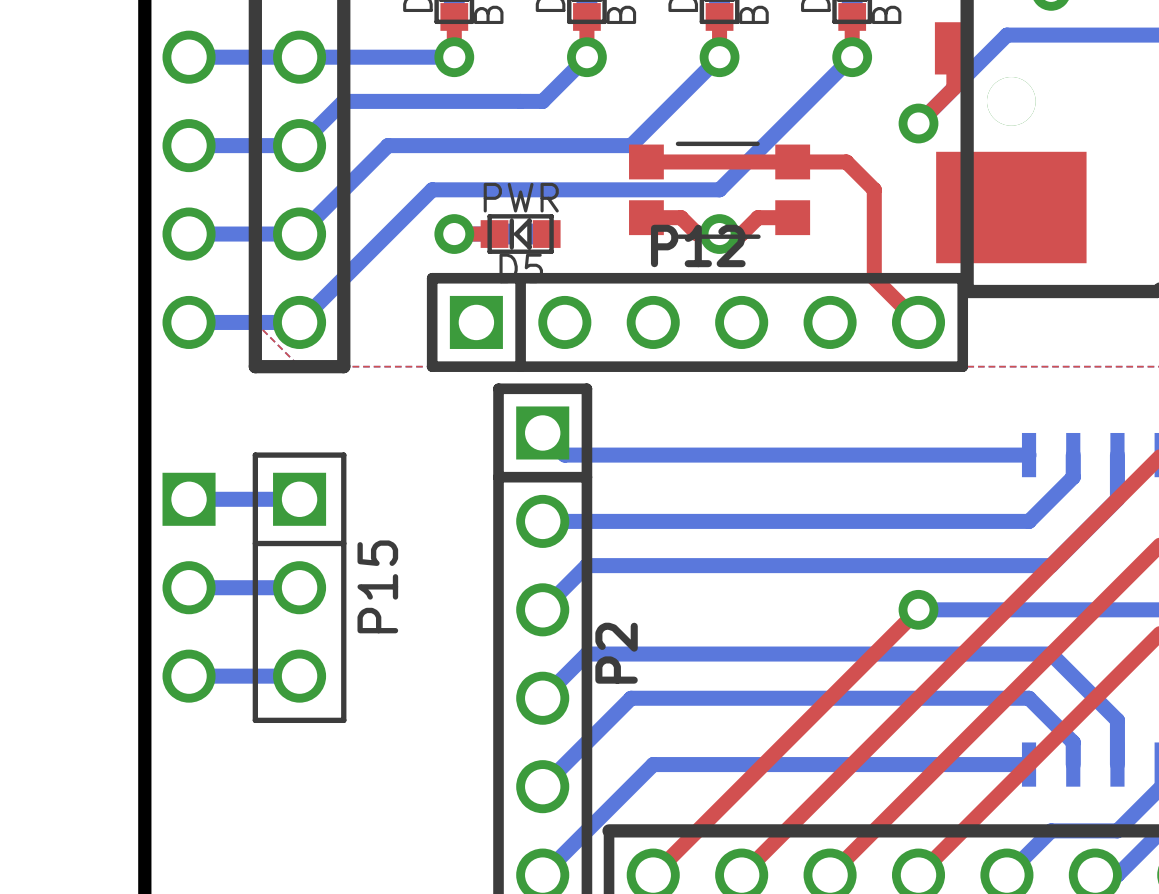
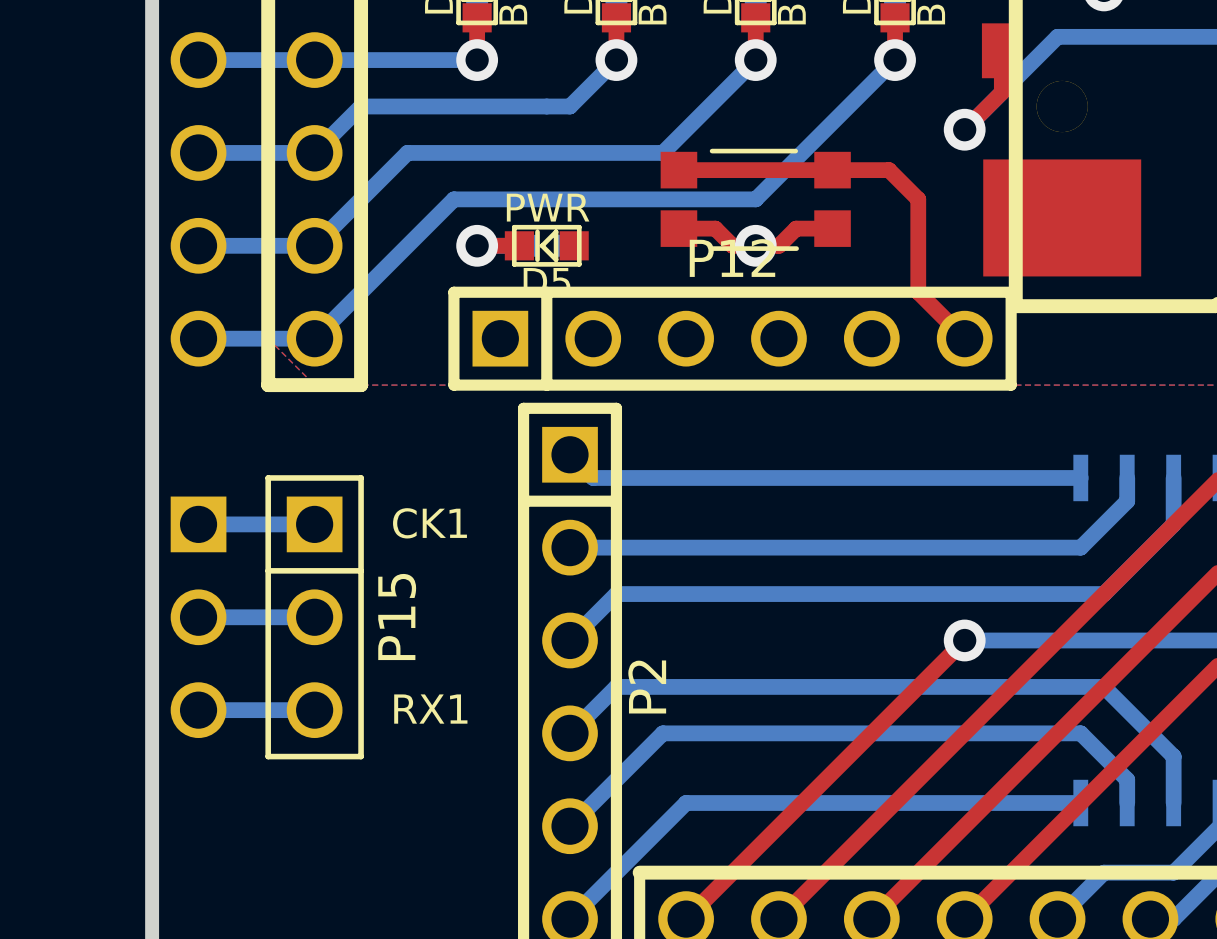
text: none -> CK1 (429, 523)
text: none -> RX1 (430, 709)

